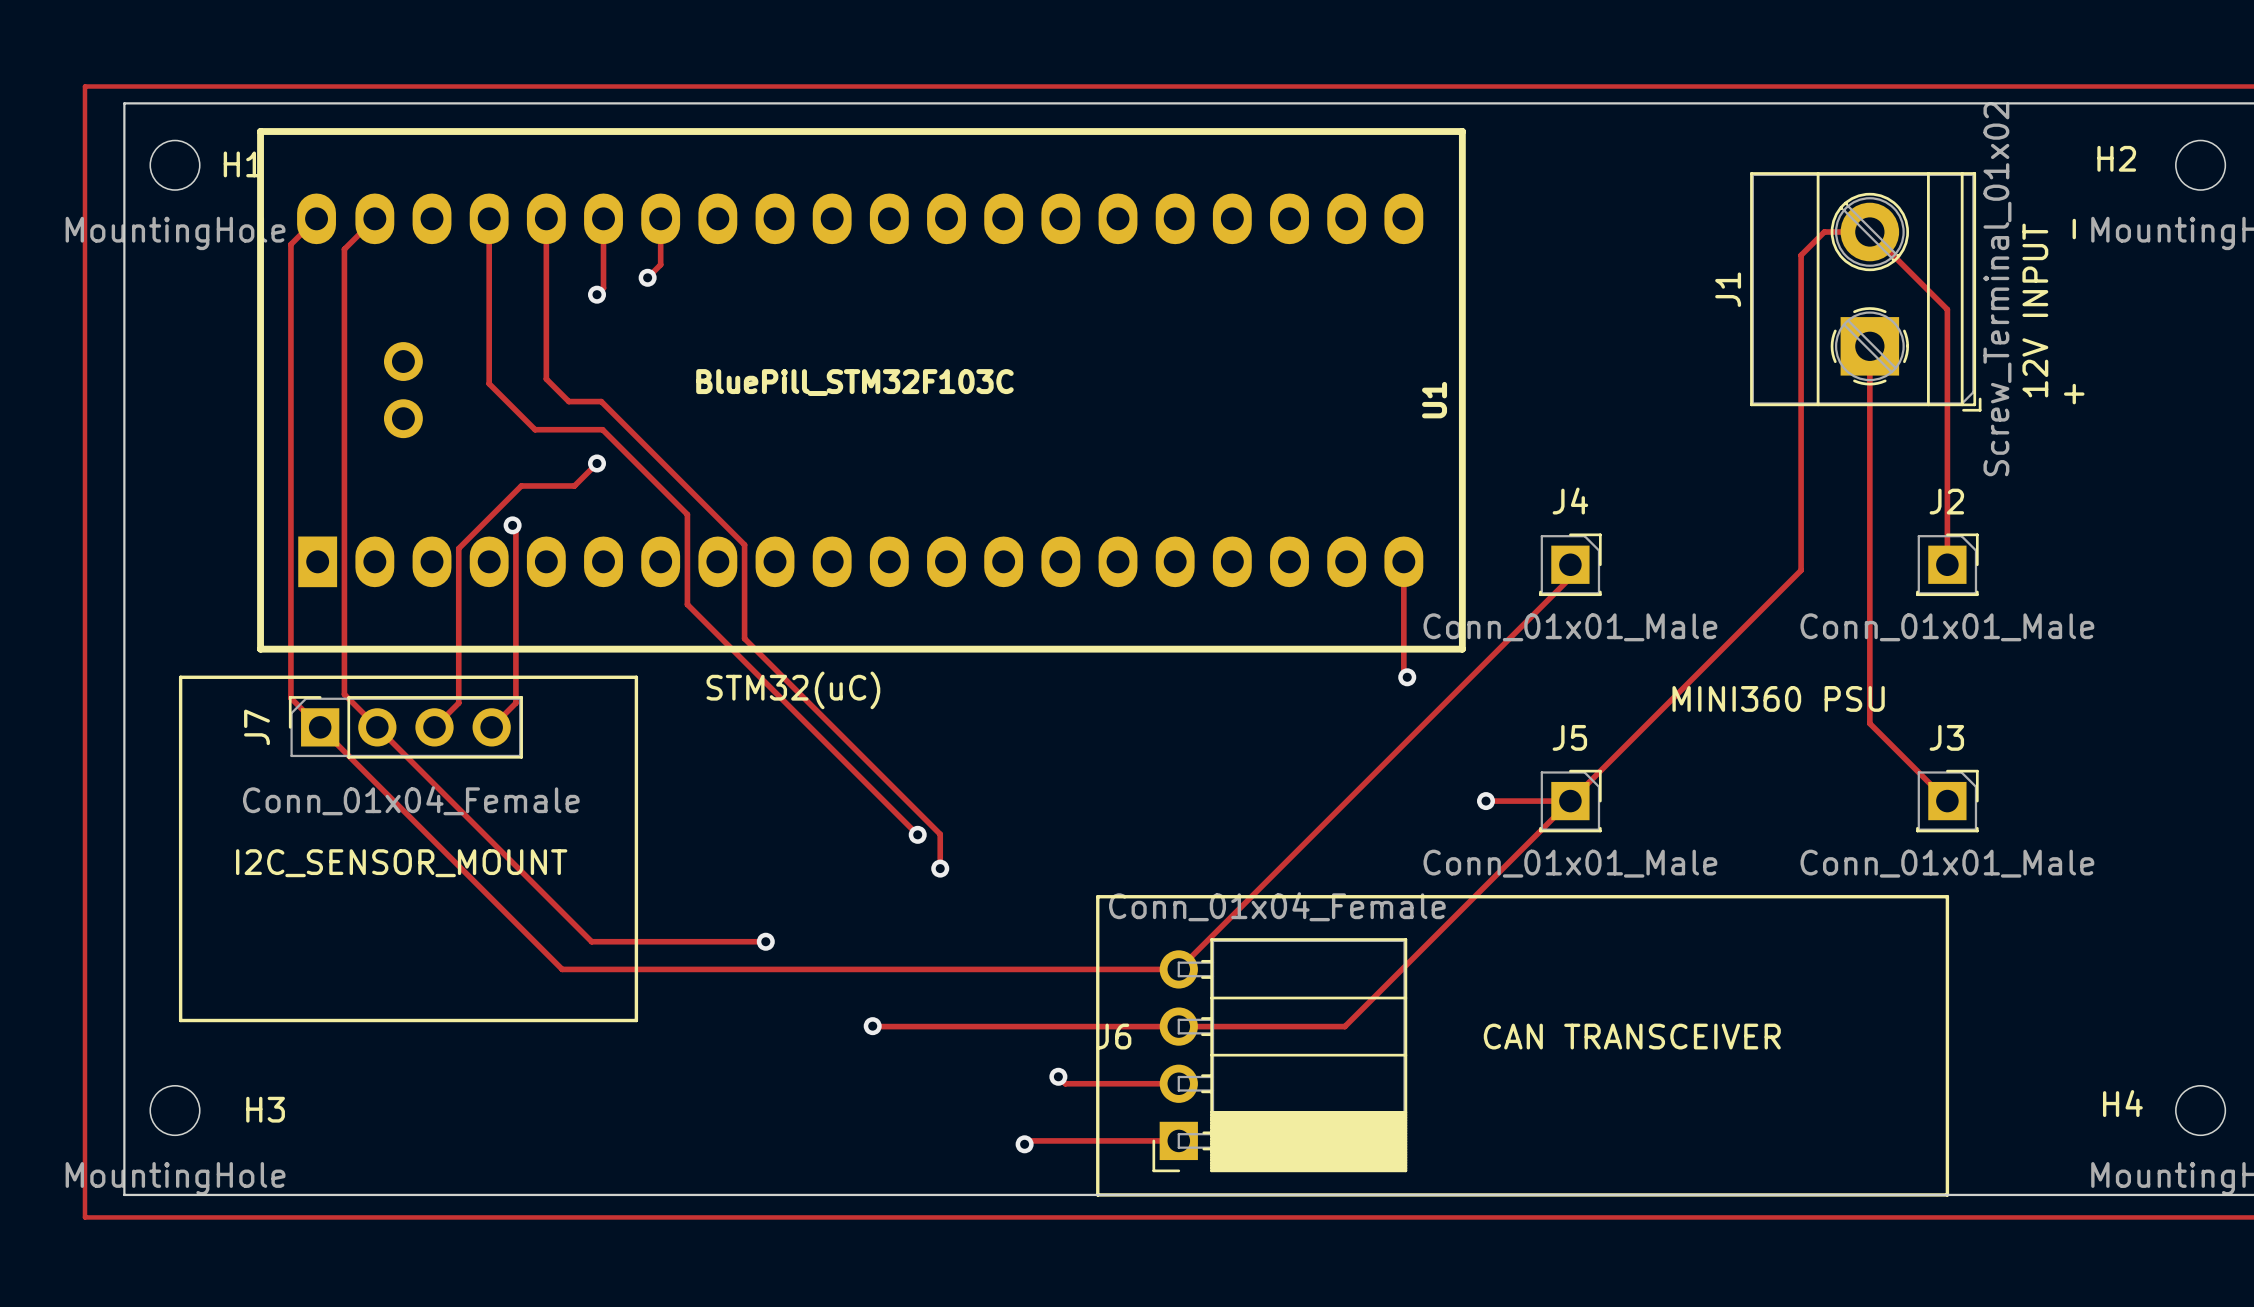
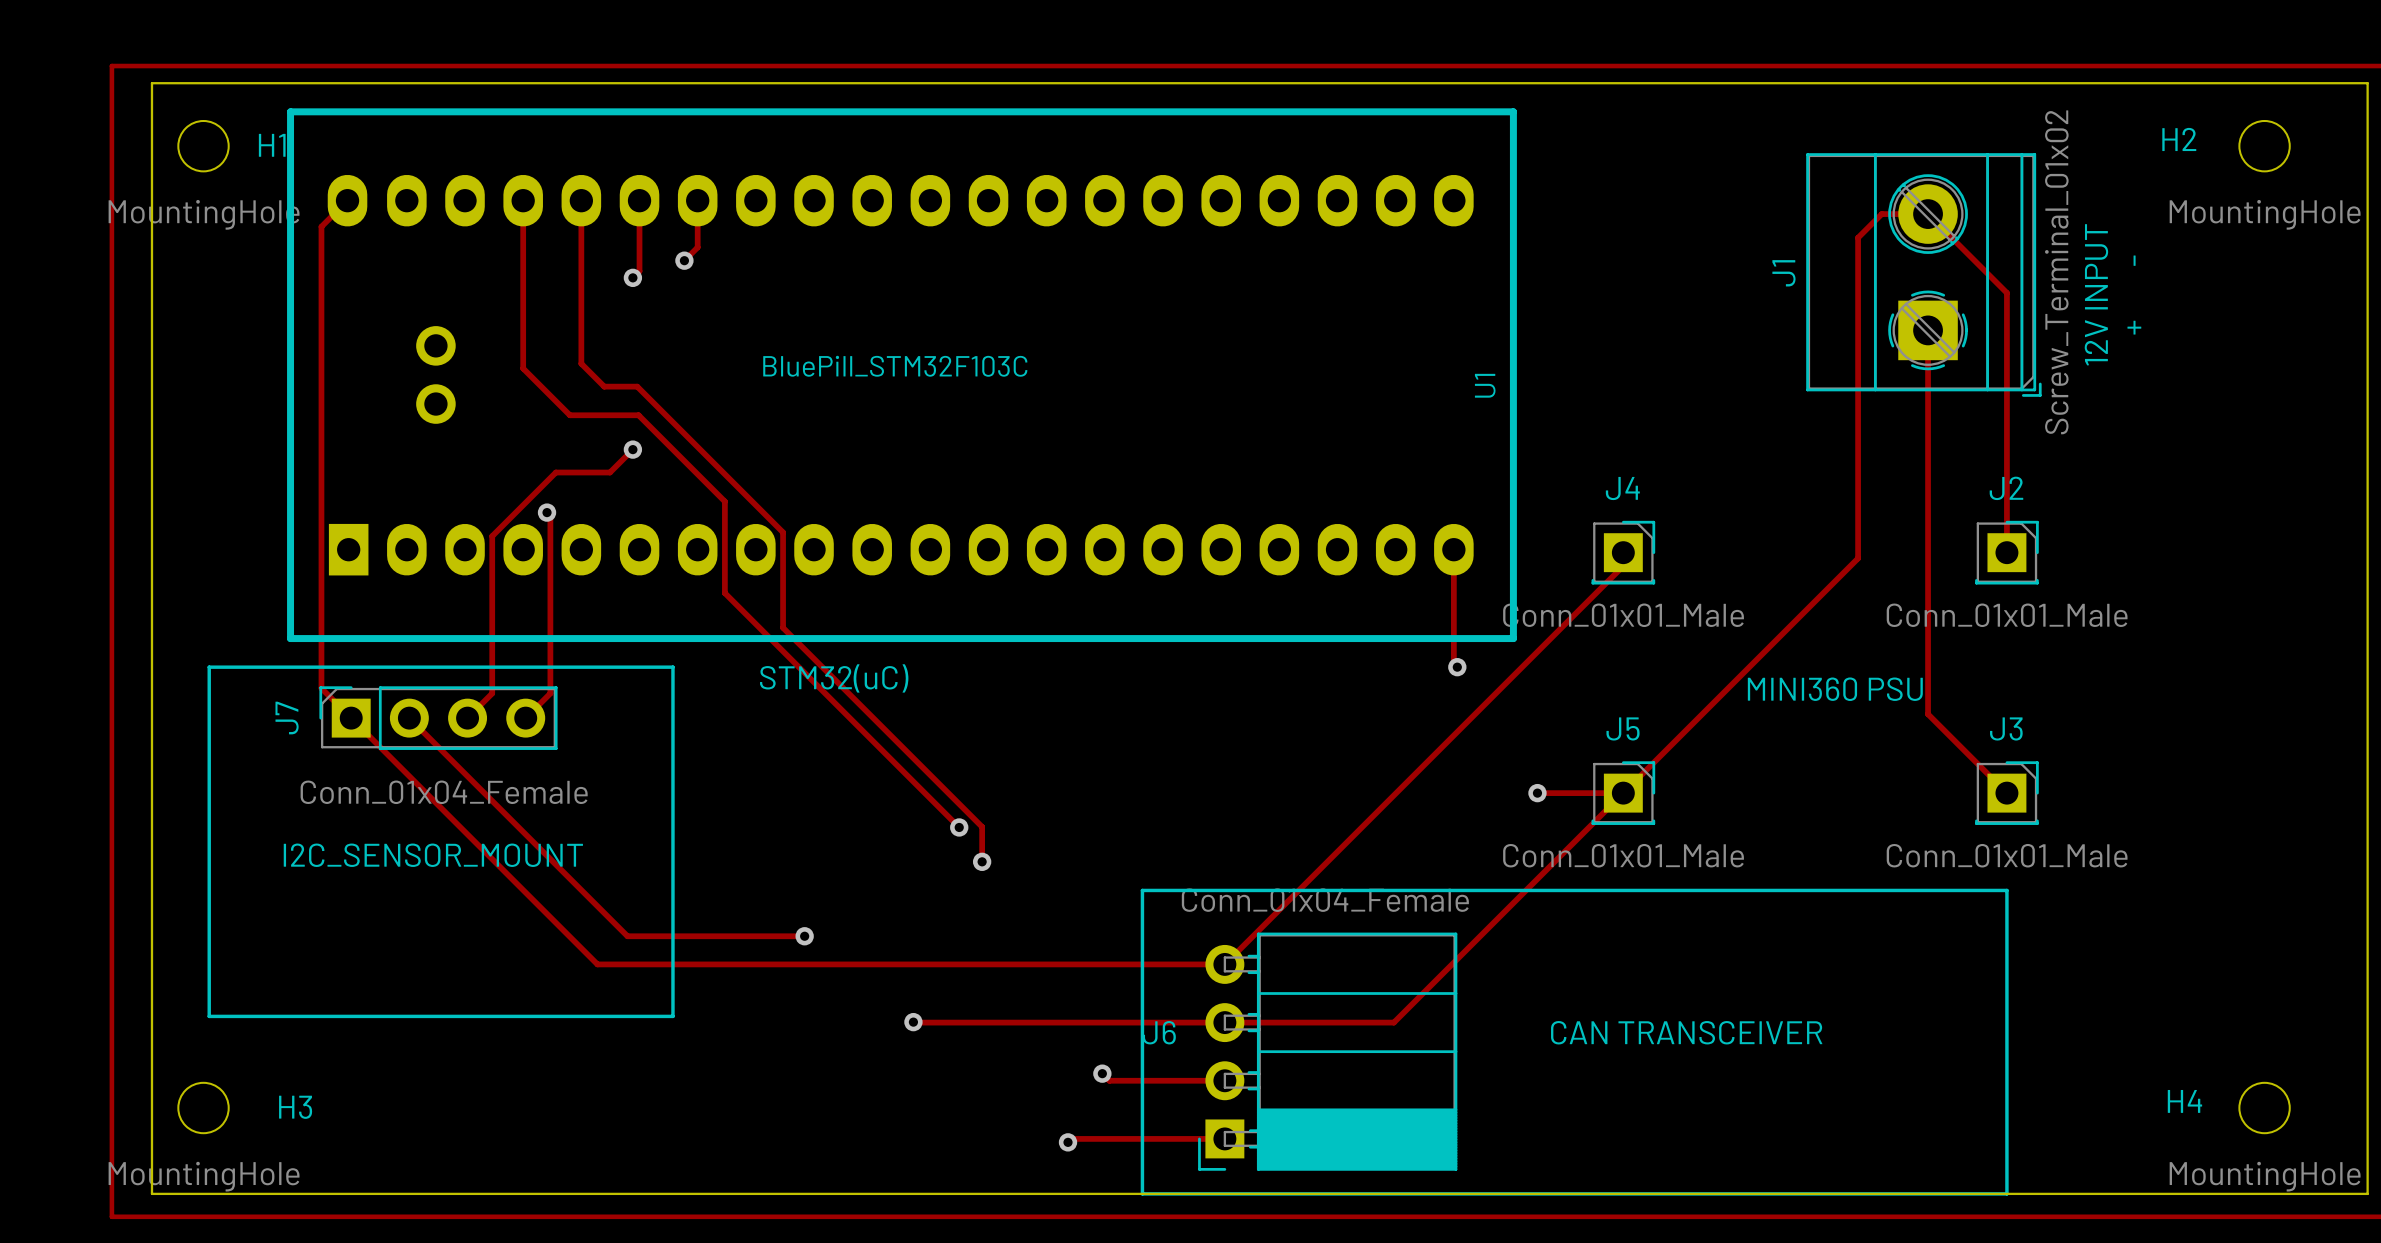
track: (374, 218) (344, 249) (344, 694) (377, 727) -> none

